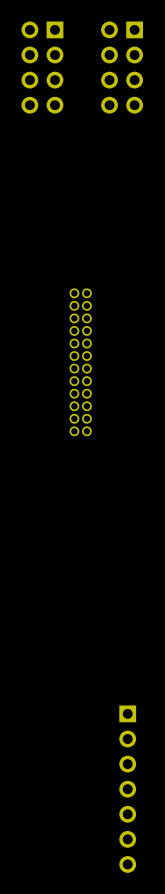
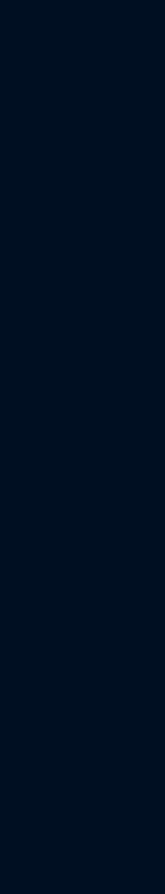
part: (42, 67) -> none
part: (122, 67) -> none
part: (80, 362) -> none
part: (127, 789) -> none

